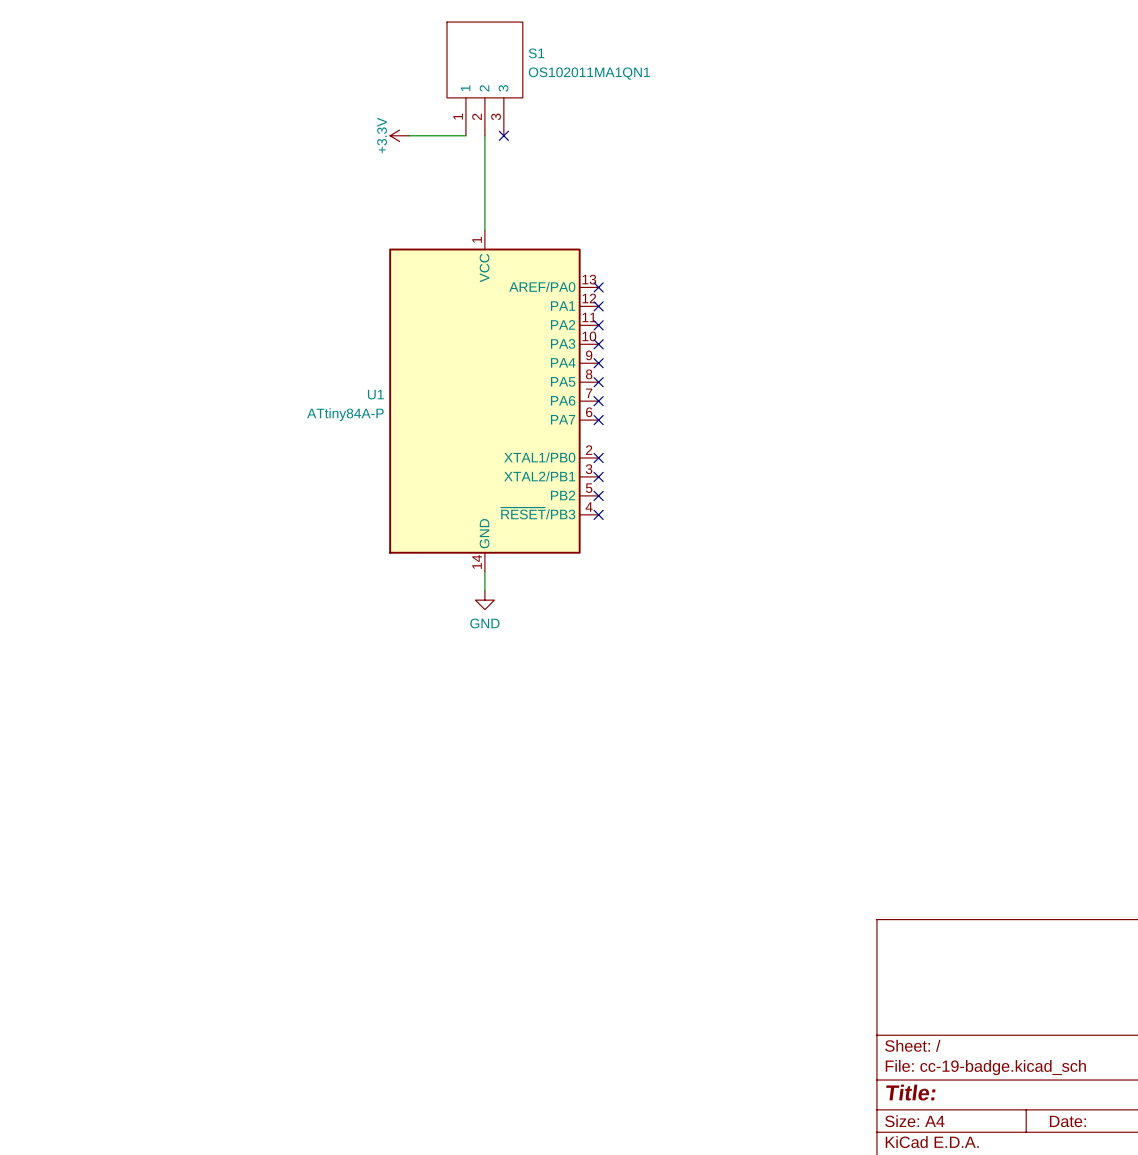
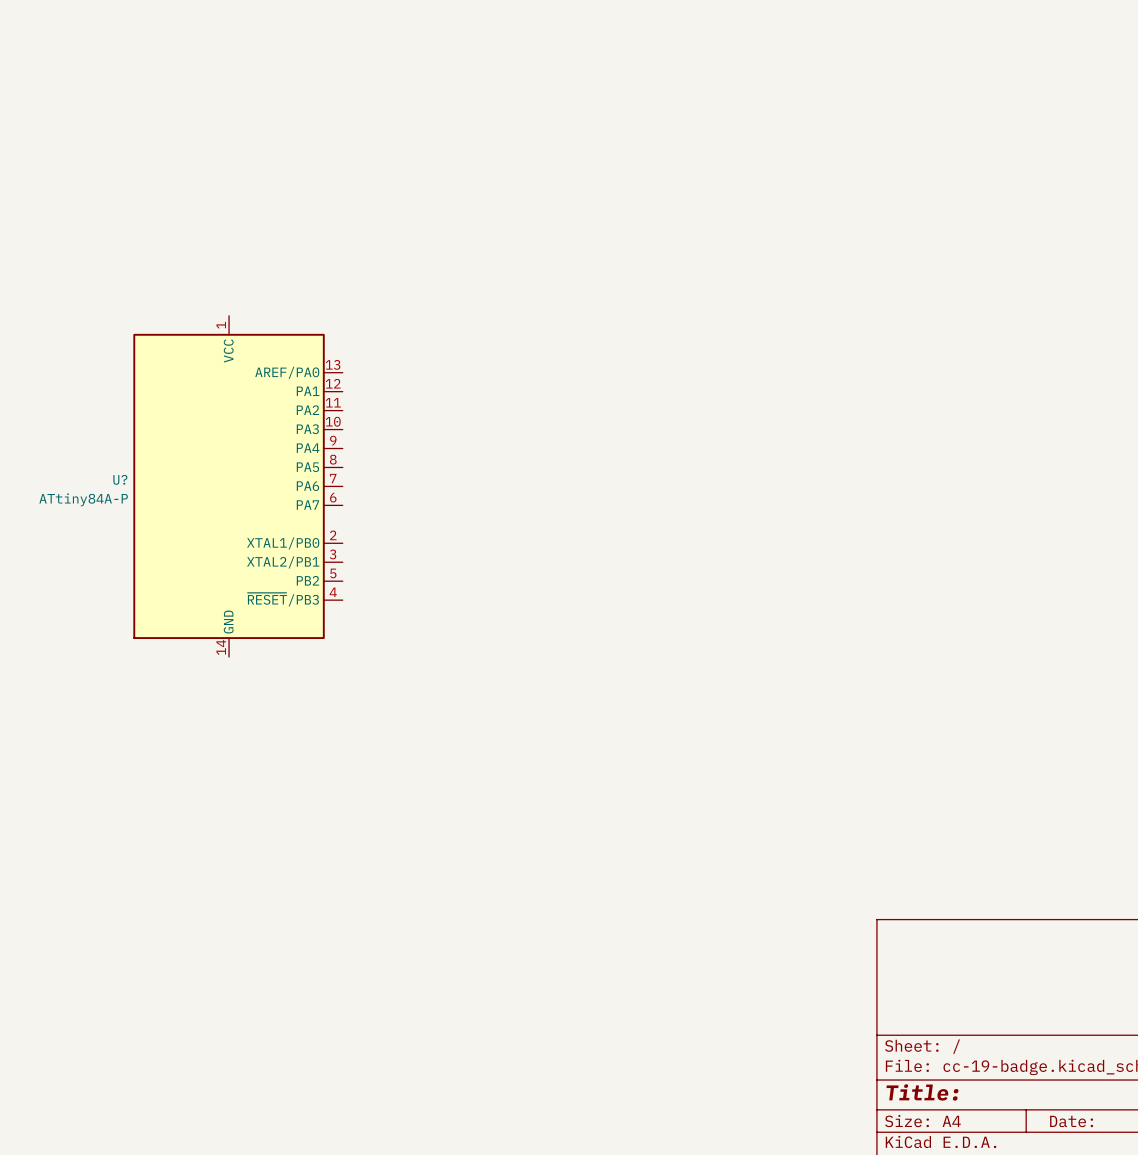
S1: OS102011MA1QN1 (484, 78) -> none
power symbol: +3.3V (399, 135) -> none
wire: (409, 135) (465, 135) -> none
wire: (484, 135) (484, 230) -> none
no-connect mark: (503, 135) -> none
no-connect mark: (598, 287) -> none
no-connect mark: (598, 306) -> none
no-connect mark: (598, 325) -> none
no-connect mark: (598, 344) -> none
no-connect mark: (598, 363) -> none
no-connect mark: (598, 382) -> none
U1: ATtiny84A-P (493, 401) -> none
no-connect mark: (598, 401) -> none
no-connect mark: (598, 420) -> none
no-connect mark: (598, 457) -> none
no-connect mark: (598, 476) -> none
U?: none -> ATtiny84A-P (238, 486)
no-connect mark: (598, 495) -> none
no-connect mark: (598, 514) -> none
wire: (484, 571) (484, 590) -> none
power symbol: GND (484, 600) -> none

